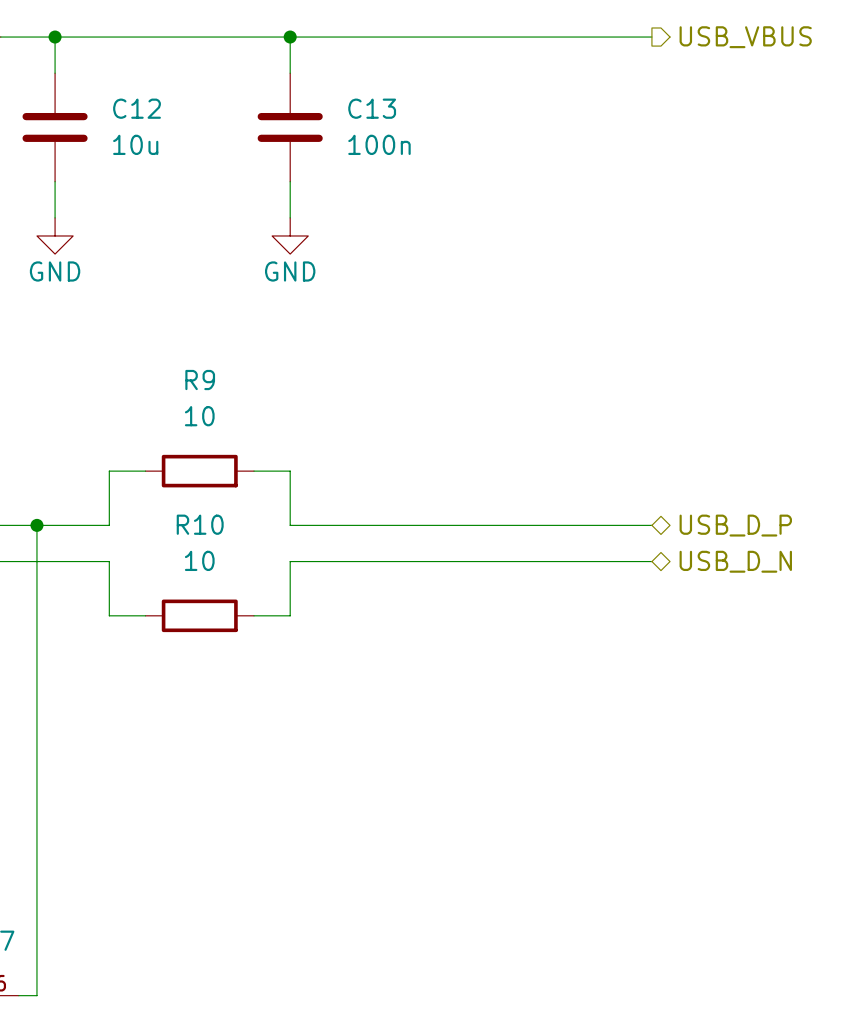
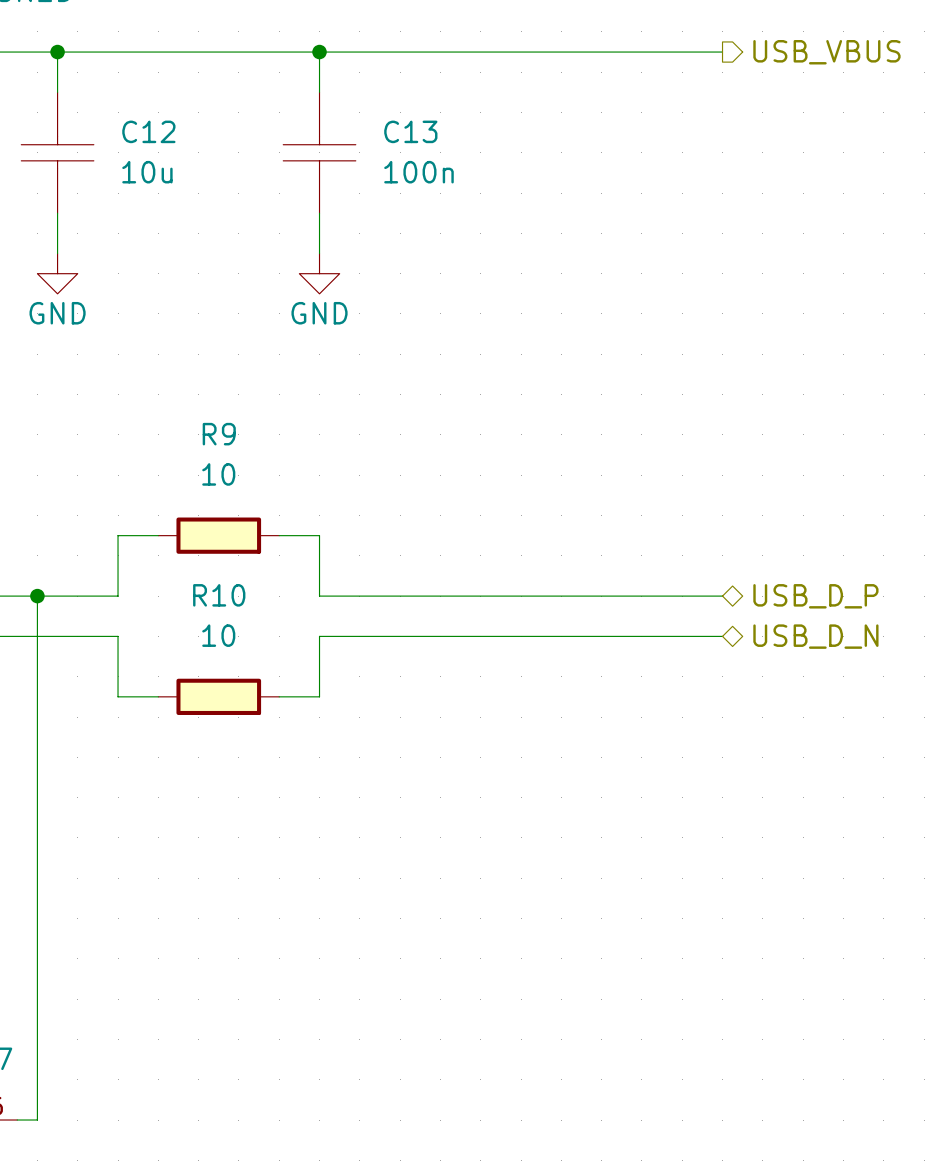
C12 symbol: [22, 73, 88, 182] -> [21, 92, 94, 214]
C13 symbol: [257, 73, 323, 182] -> [283, 92, 356, 214]
R9 symbol: [145, 454, 255, 488] -> [158, 517, 280, 554]
R10 symbol: [145, 599, 255, 633] -> [158, 678, 280, 715]

